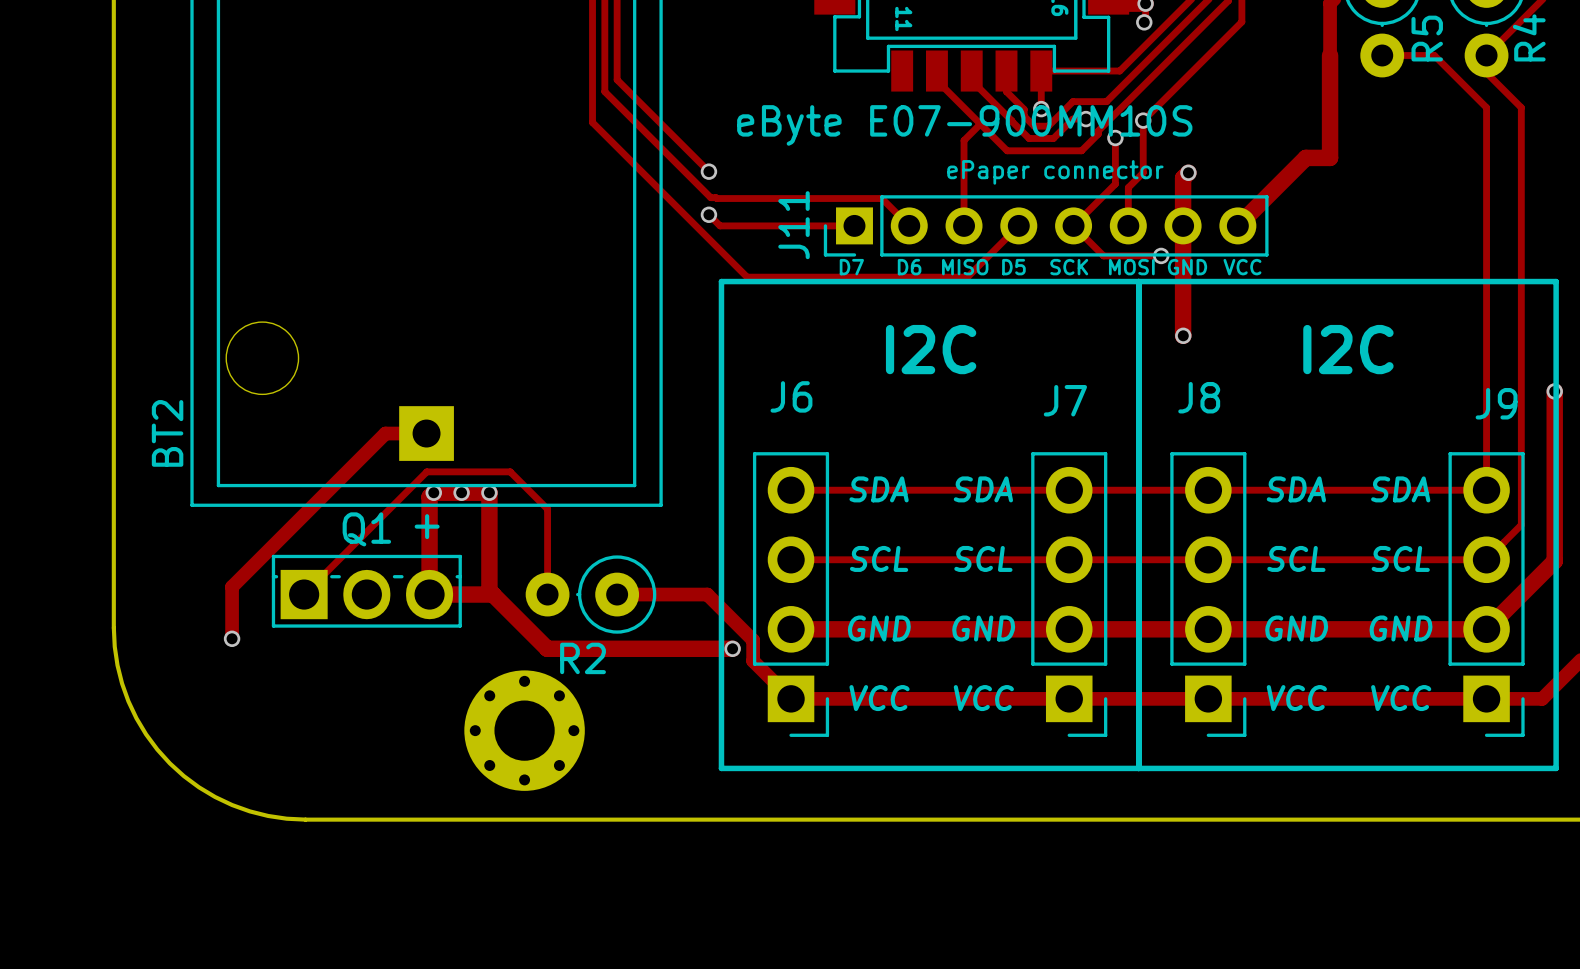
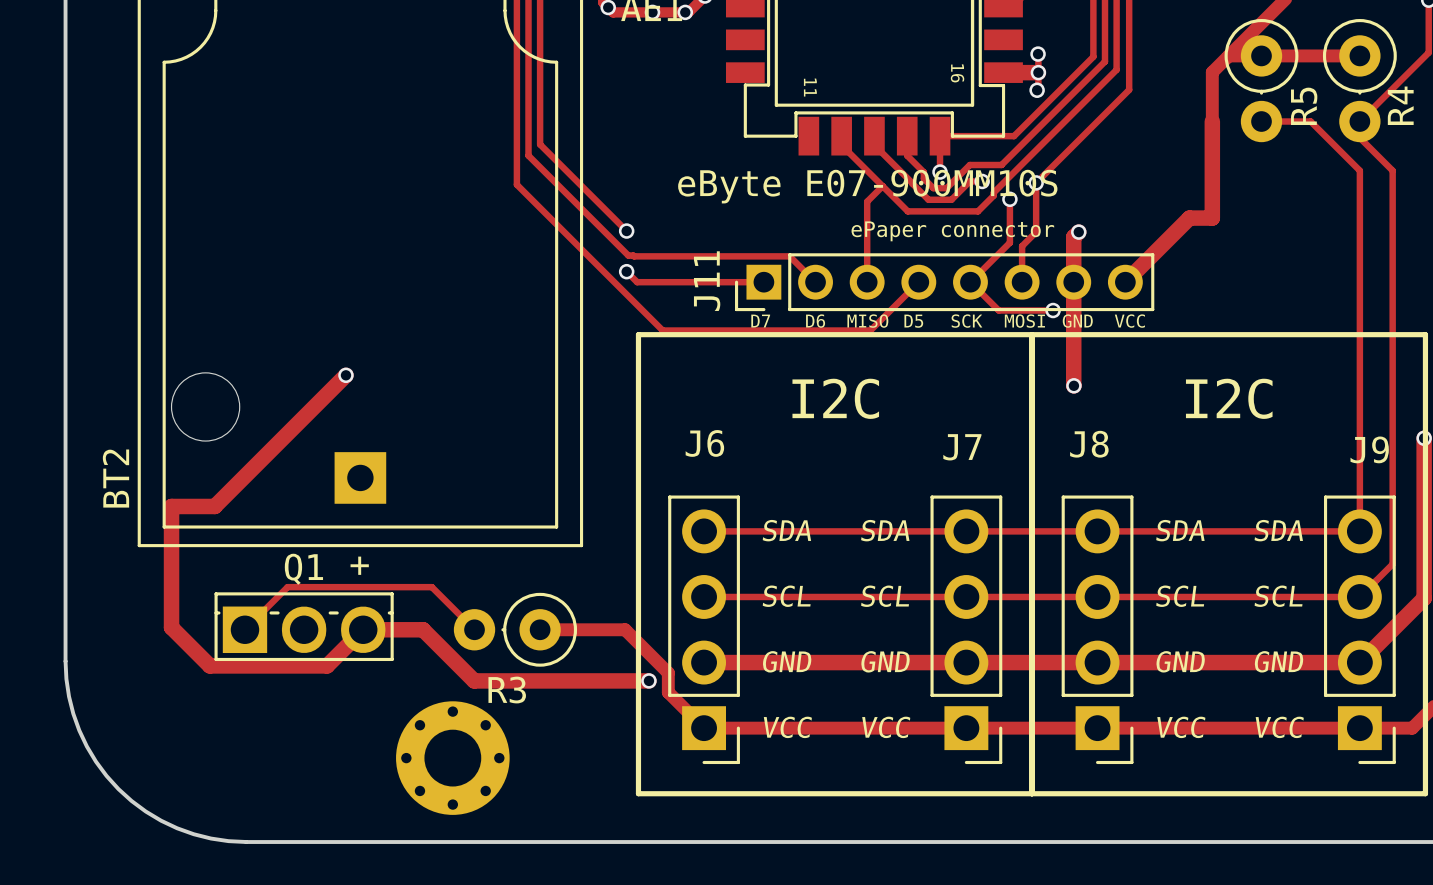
via: none -> (345, 375)
track: (426, 433) (385, 433) (232, 586) (232, 638) -> none
via: (433, 492) -> none
via: (461, 492) -> none
via: (489, 492) -> none
track: (349, 549) (426, 471) (510, 471) (547, 509) (547, 594) -> (287, 587) (431, 587) (474, 629)
track: (429, 594) (429, 496) (433, 492) (489, 492) (489, 590) (493, 594) -> (363, 629) (327, 665) (209, 665) (171, 627) (171, 506) (214, 506) (345, 375)
via: (232, 638) -> none
R2 name: R2 (583, 658) -> R3 (507, 690)

